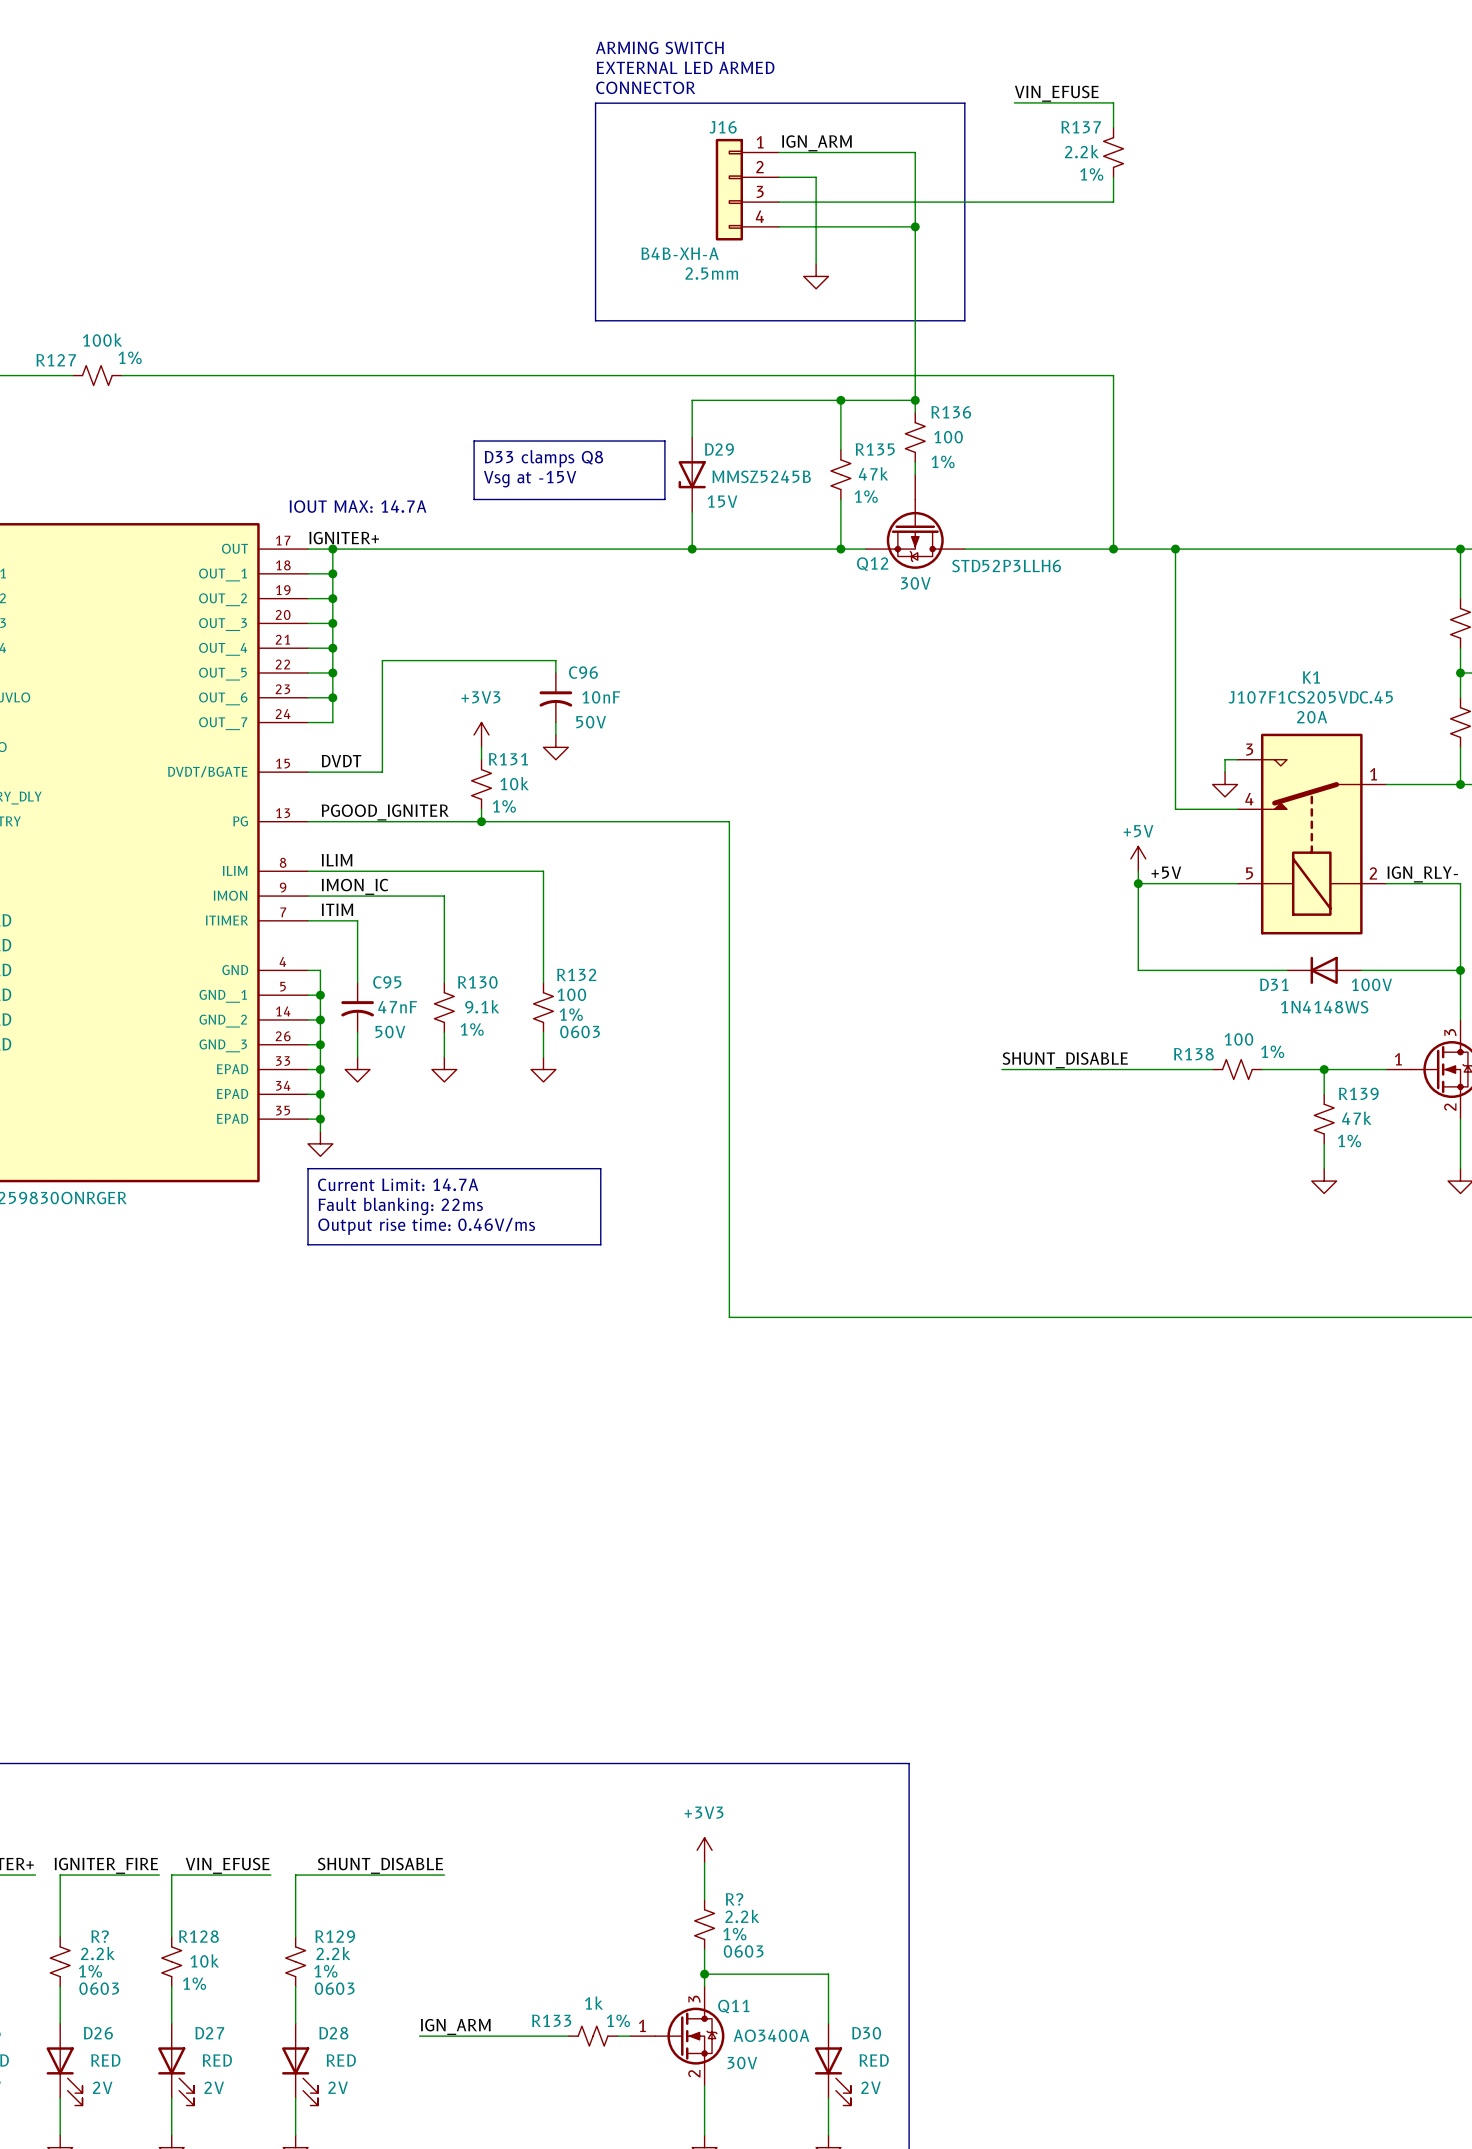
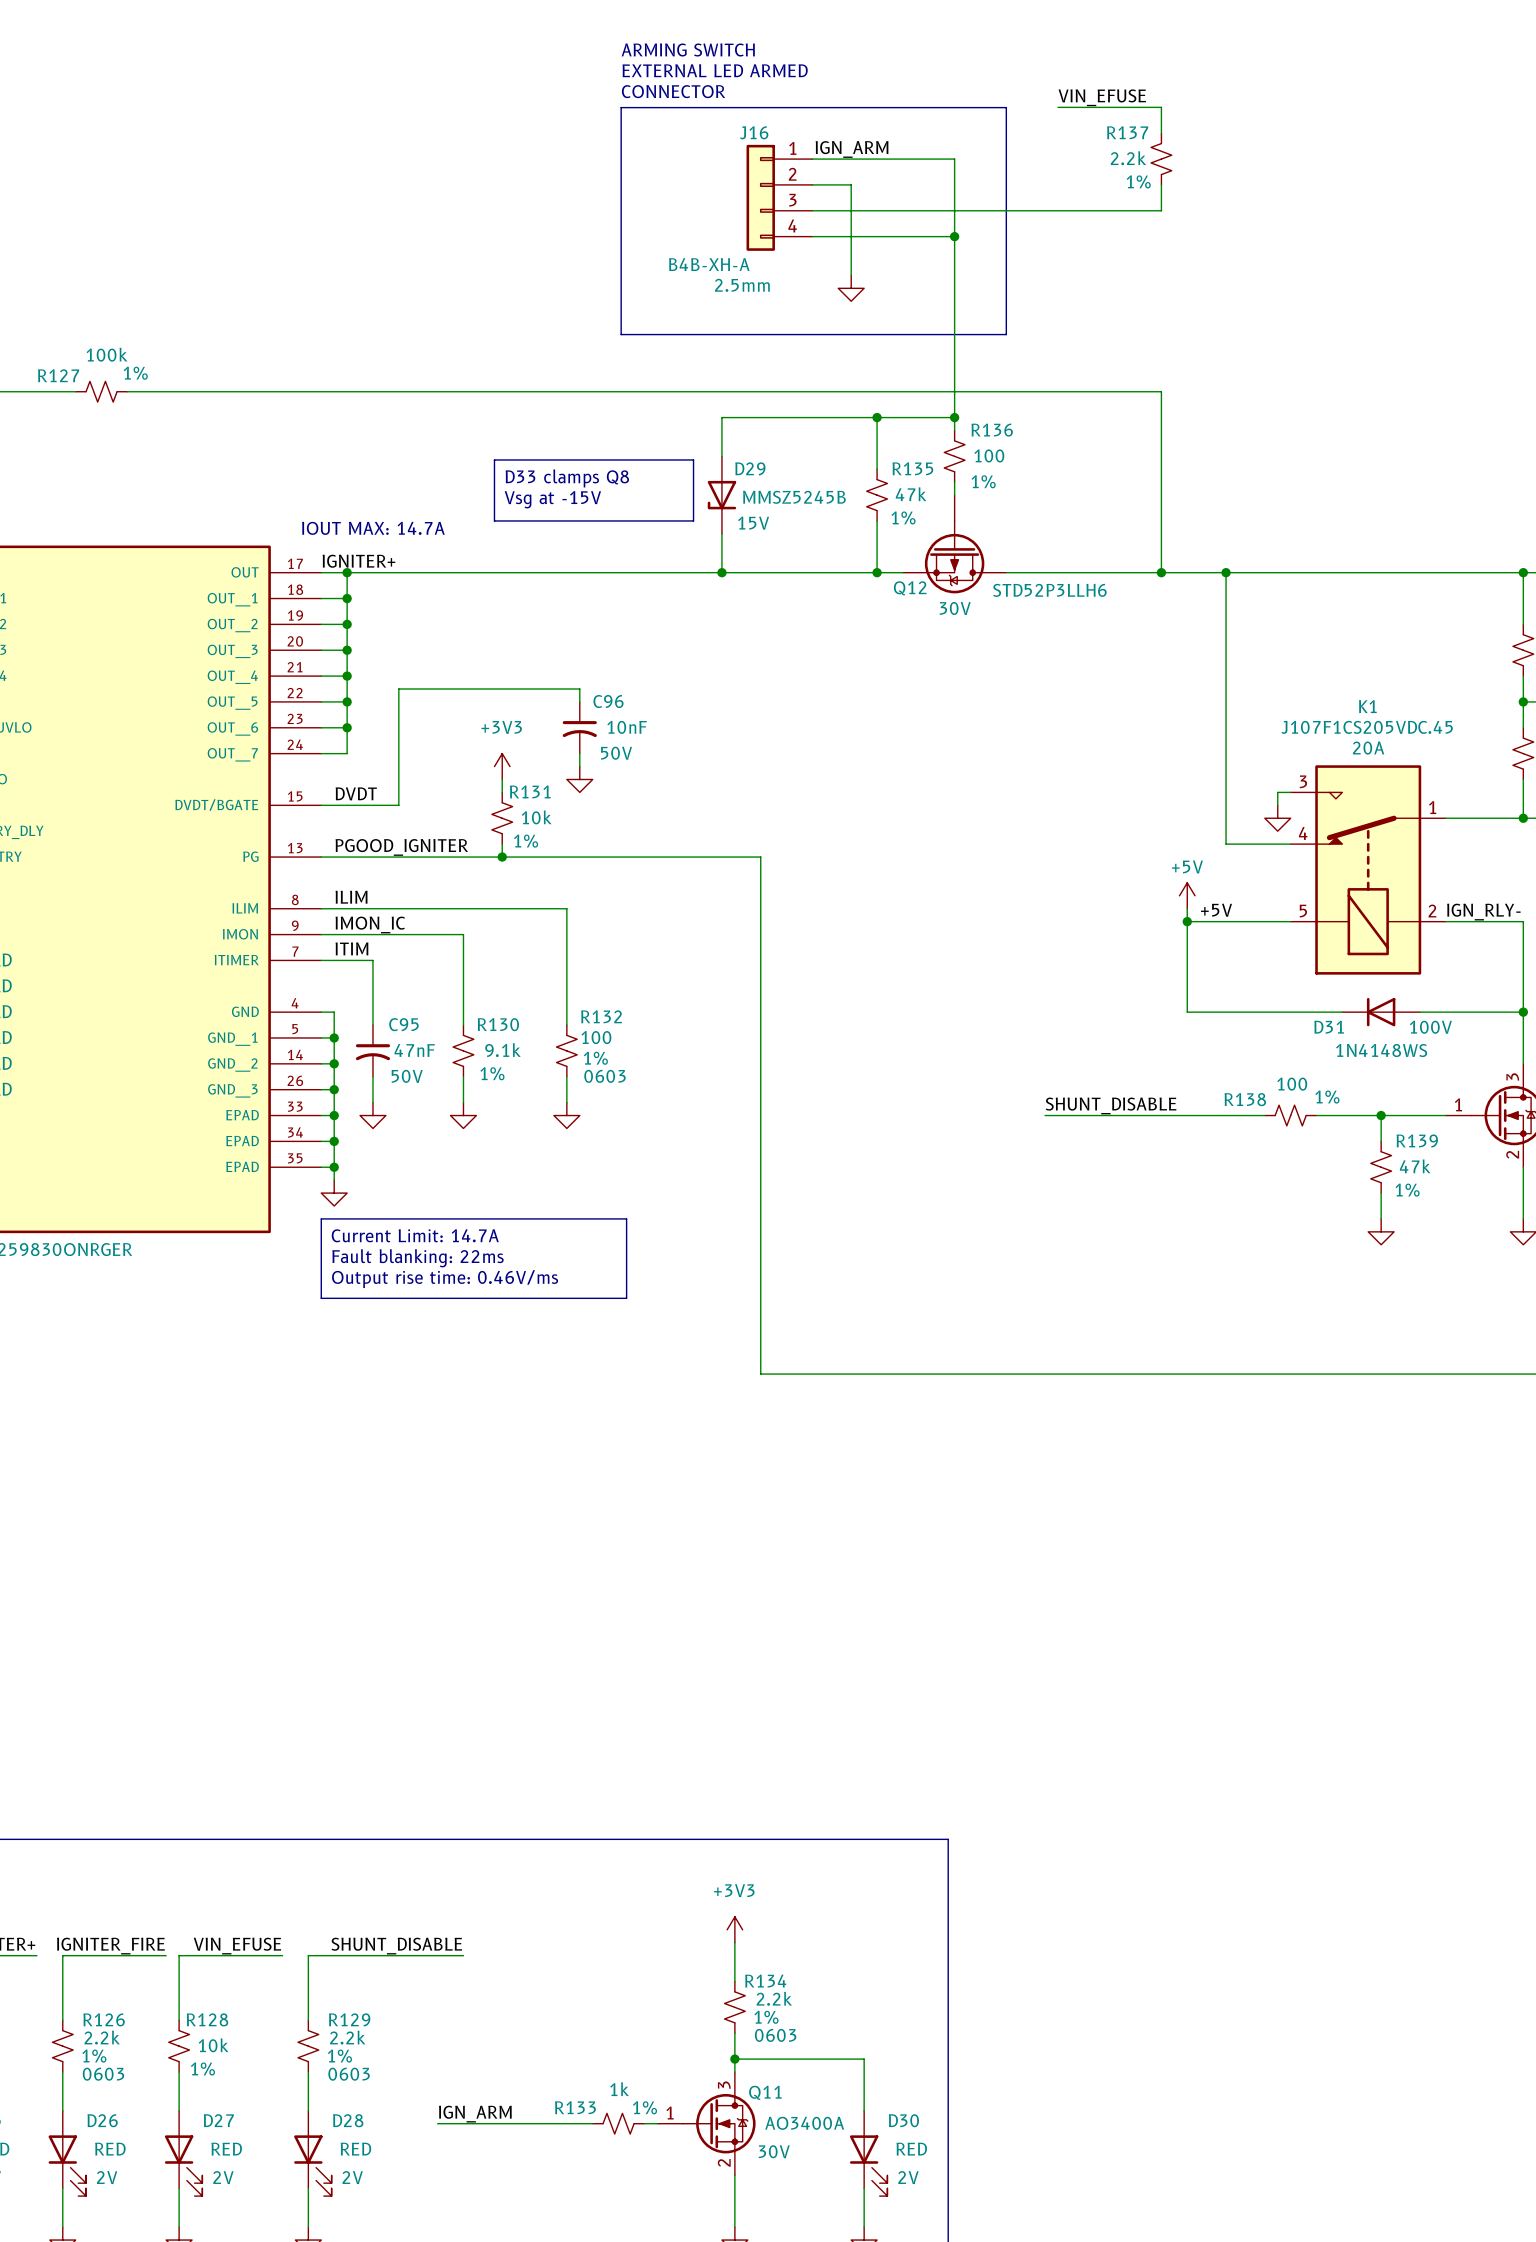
R? name: R? (734, 1899) -> R134 (765, 1981)
R? name: R? (100, 1936) -> R126 (104, 2019)

